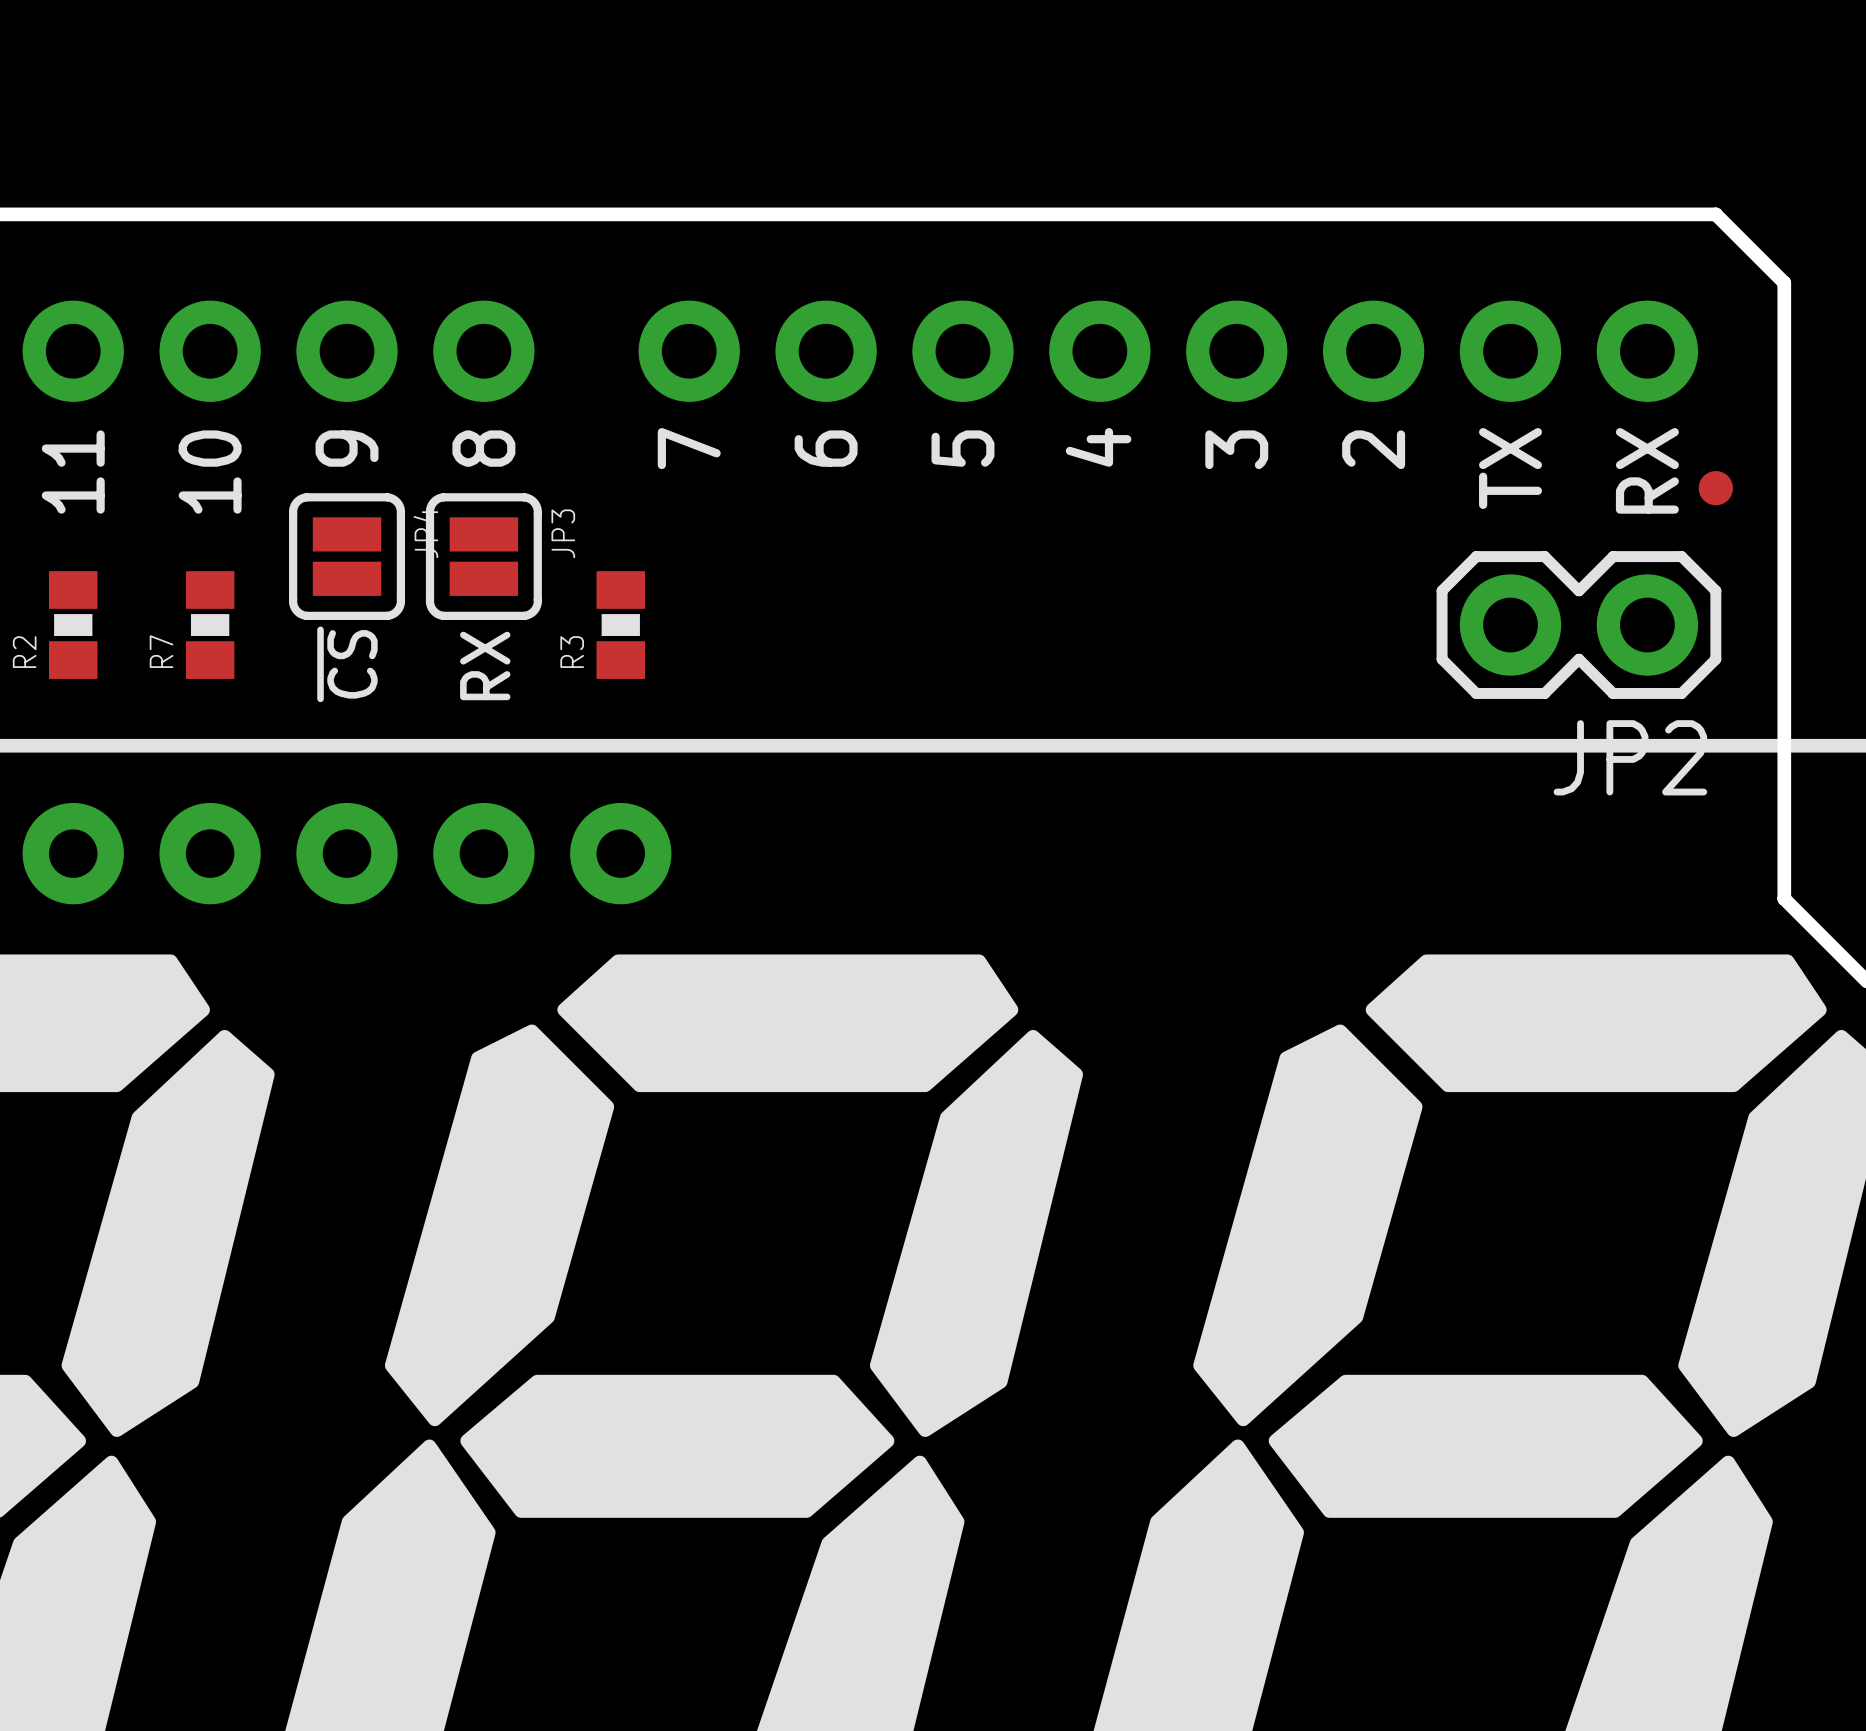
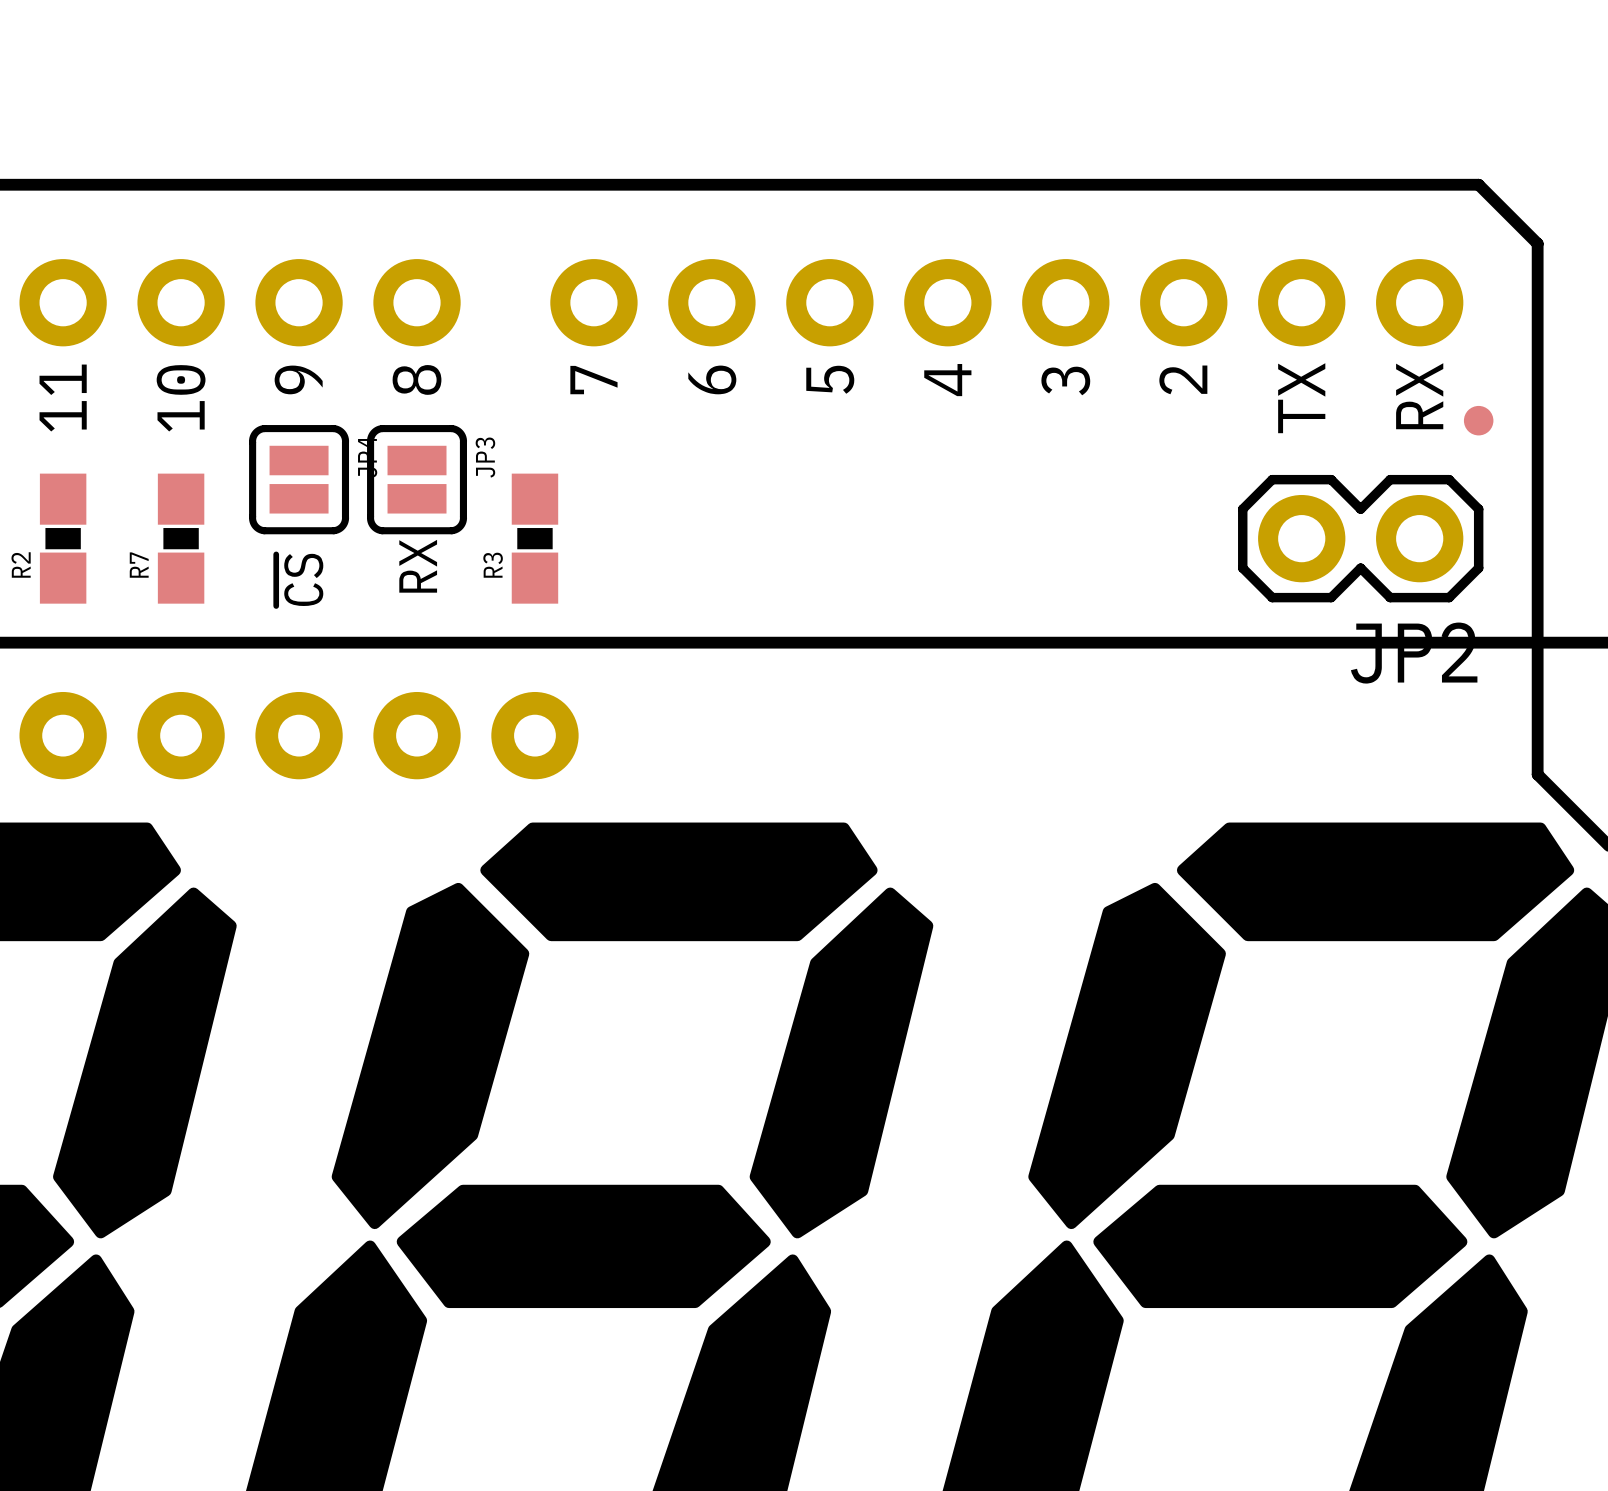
R2 footprint: [49, 571, 98, 679] -> [39, 473, 87, 604]
R7 footprint: [185, 571, 235, 679] -> [157, 473, 205, 604]
R3 footprint: [596, 571, 646, 679] -> [511, 473, 559, 604]

